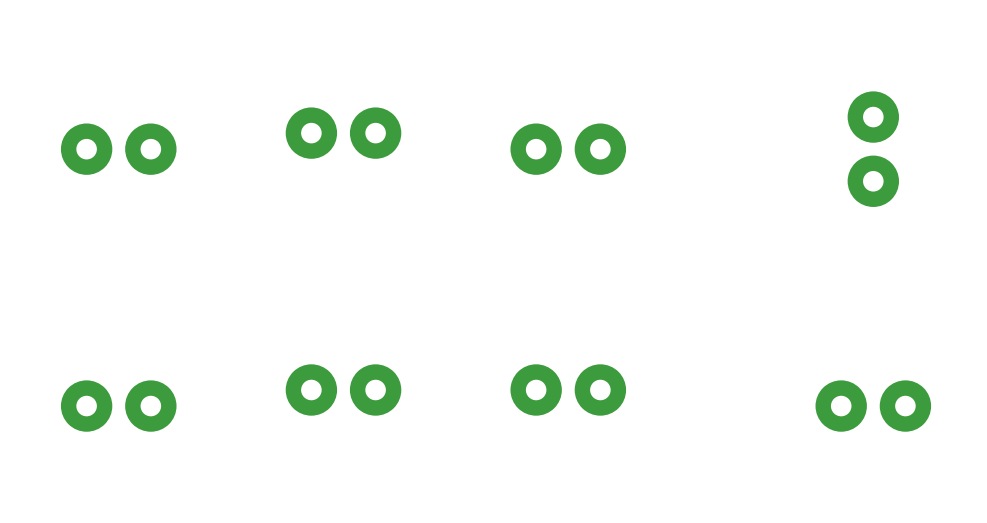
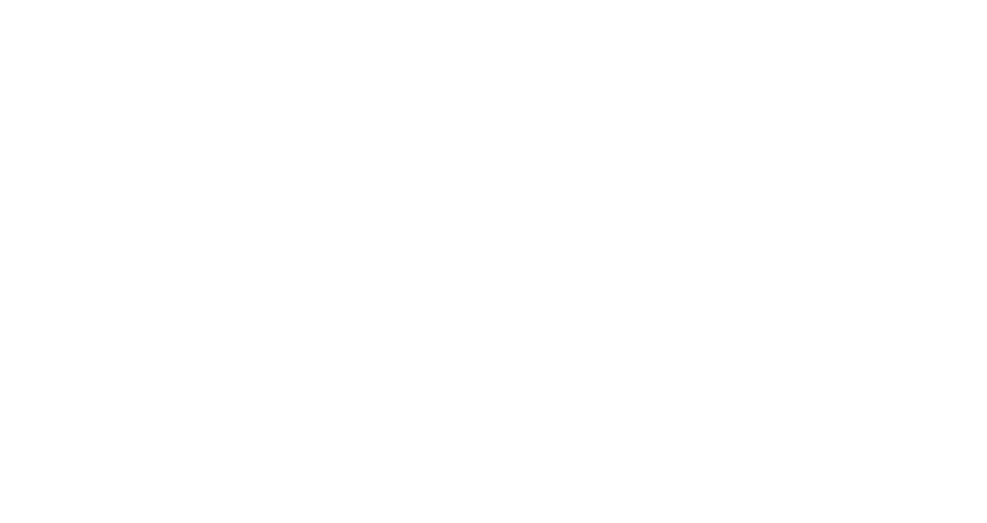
part: (343, 133) -> none
part: (118, 149) -> none
part: (568, 149) -> none
part: (873, 149) -> none
part: (343, 389) -> none
part: (568, 389) -> none
part: (118, 406) -> none
part: (873, 406) -> none

